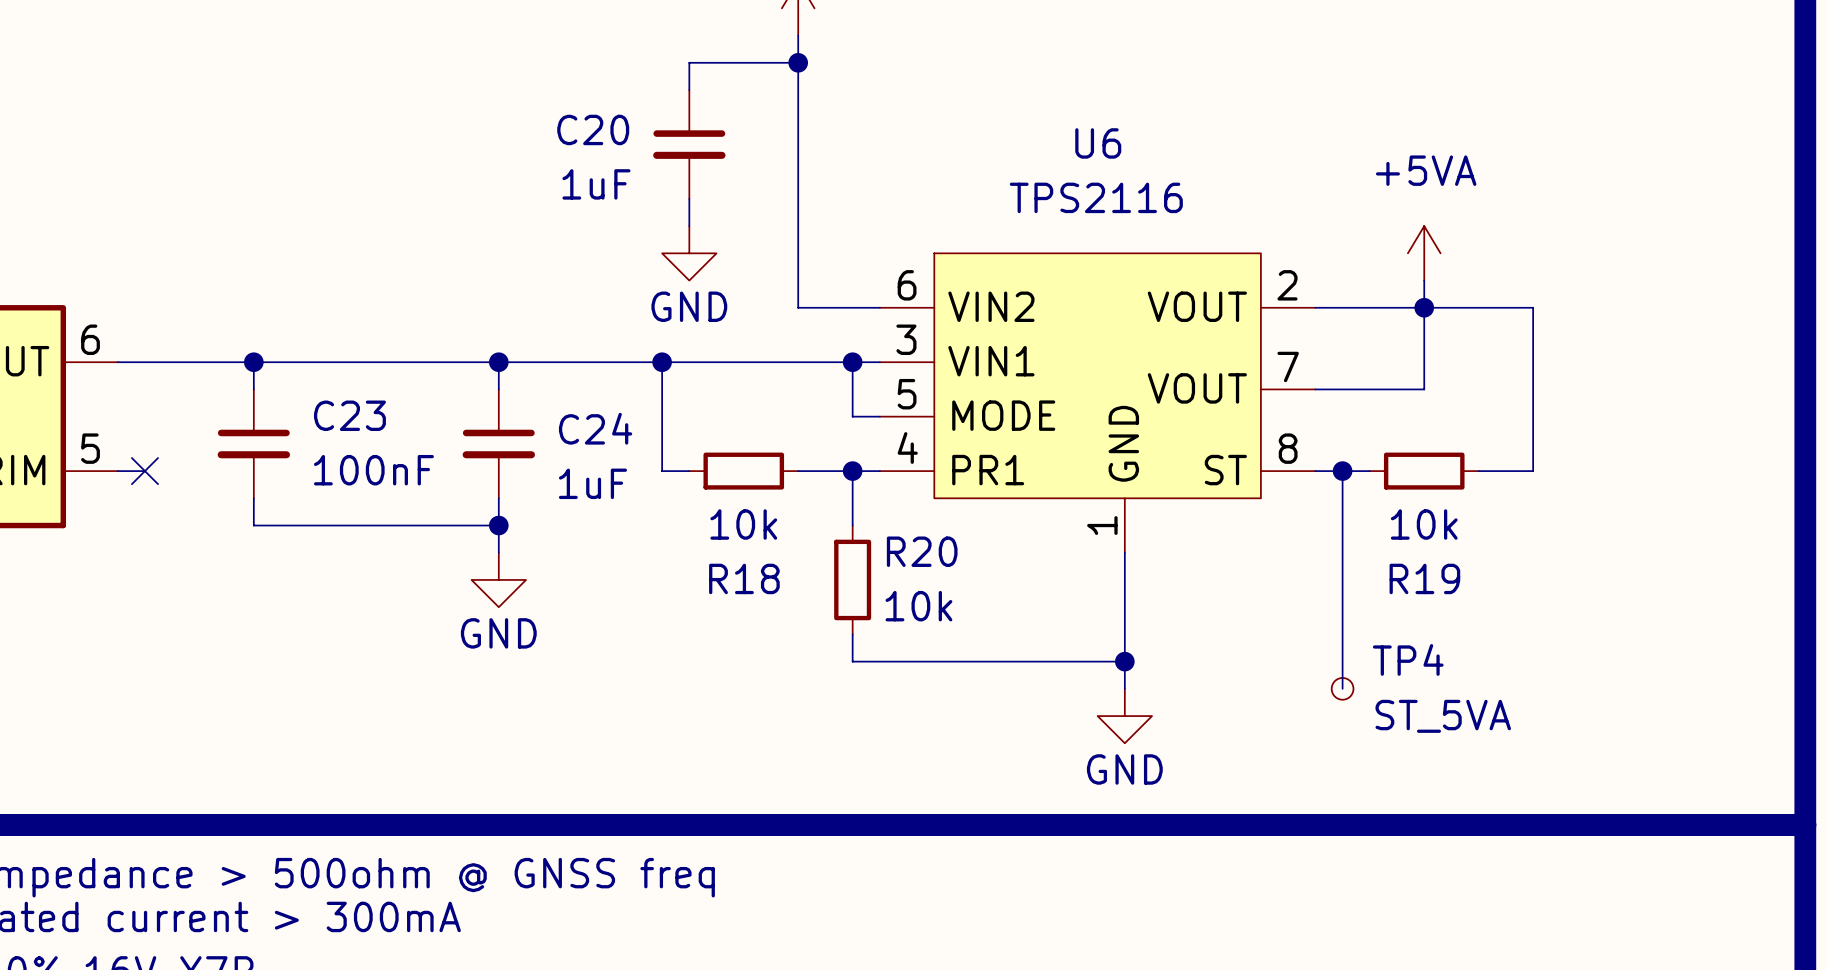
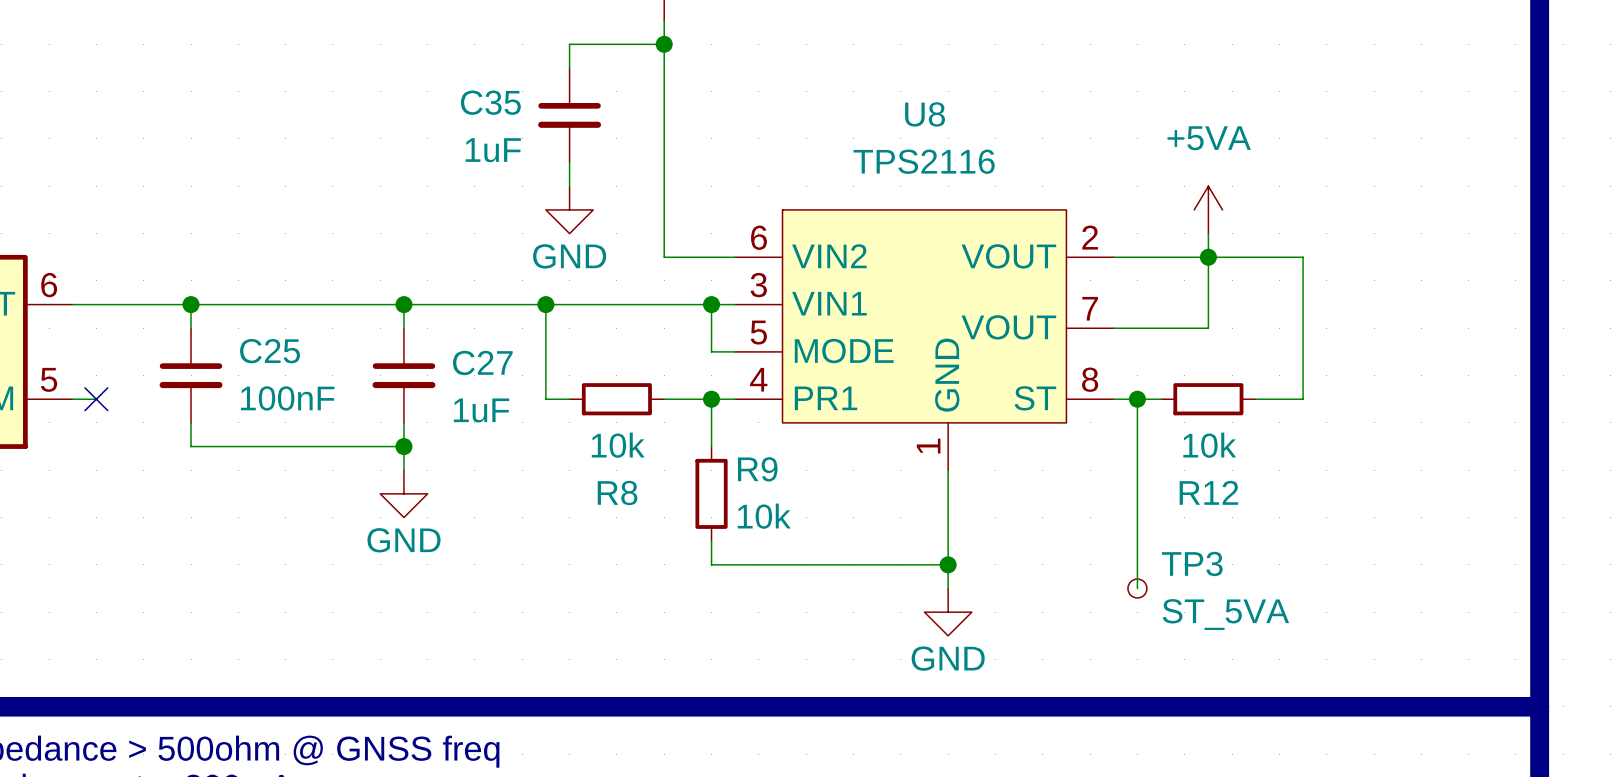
C20 name: C20 (593, 129) -> C35 (490, 102)
U6 name: U6 (1098, 143) -> U8 (925, 114)
C23 name: C23 (349, 415) -> C25 (270, 351)
C24 name: C24 (595, 428) -> C27 (482, 362)
R20 name: R20 (922, 551) -> R9 (757, 469)
R18 name: R18 (744, 578) -> R8 (617, 492)
R19 name: R19 (1424, 578) -> R12 (1208, 492)
TP4 name: TP4 (1408, 659) -> TP3 (1192, 563)

